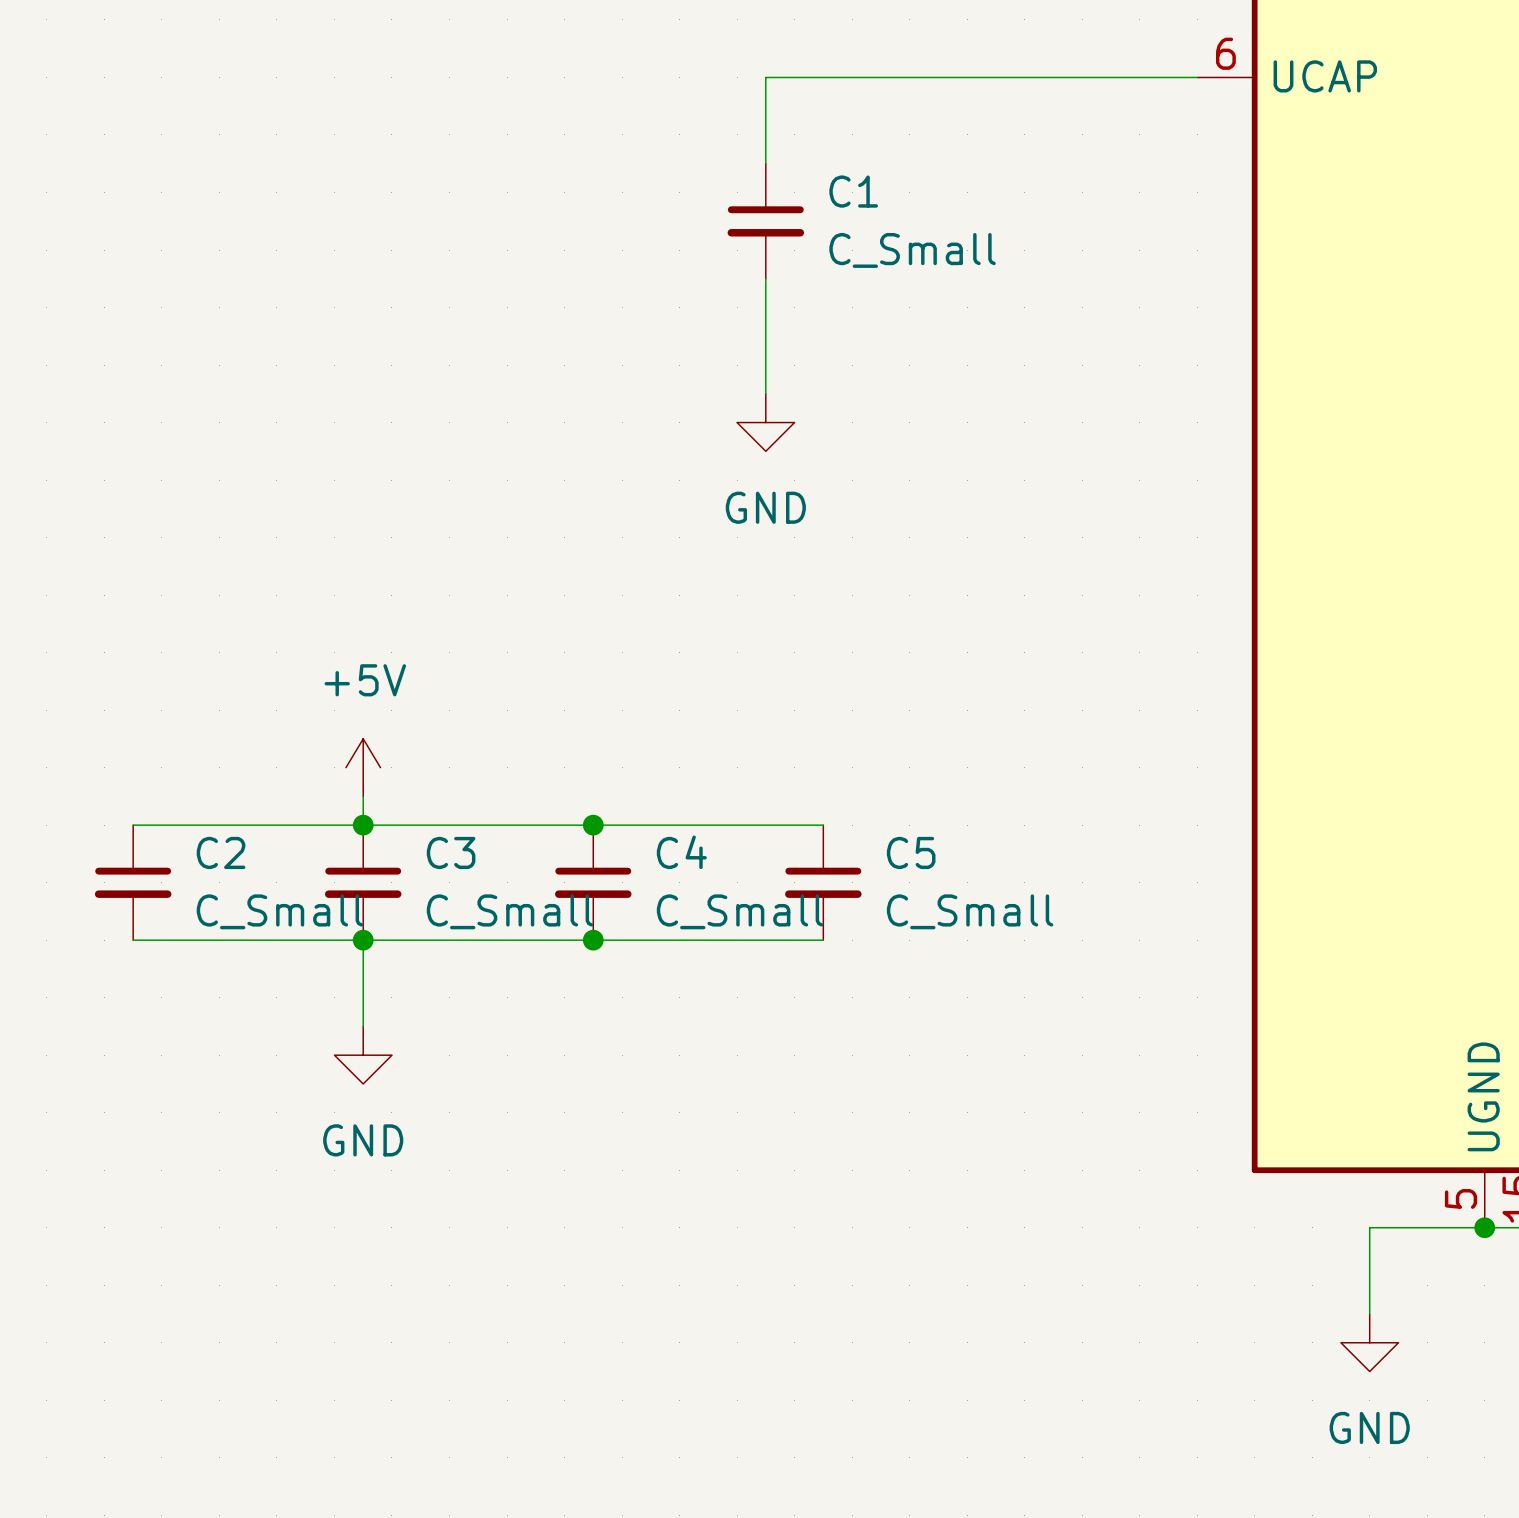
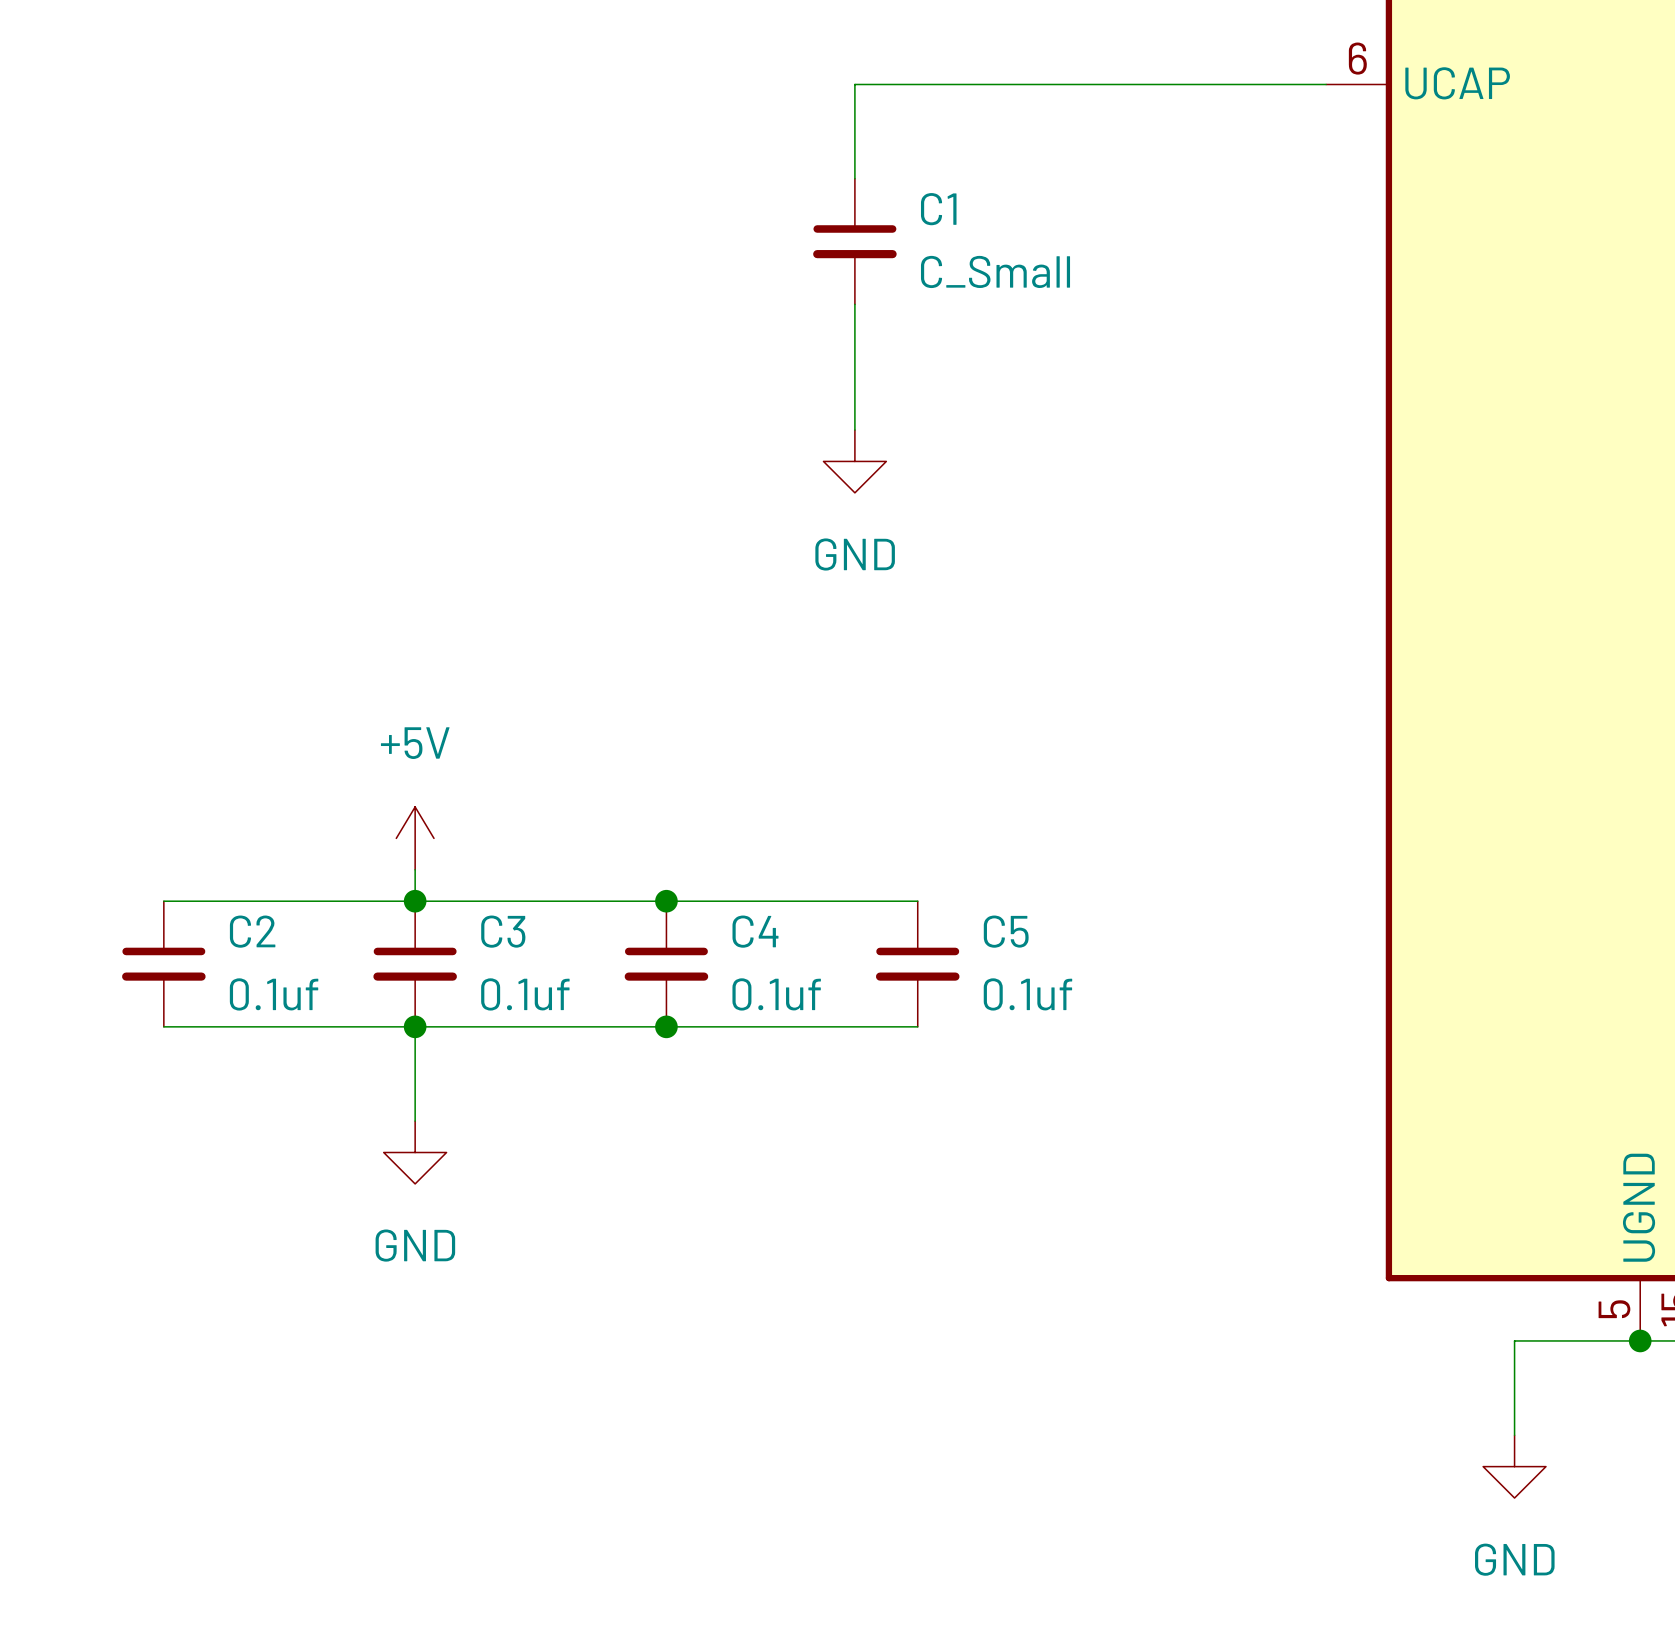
C2 value: C_Small (279, 911) -> 0.1uf (274, 994)
C3 value: C_Small (509, 911) -> 0.1uf (525, 994)
C4 value: C_Small (740, 911) -> 0.1uf (776, 994)
C5 value: C_Small (970, 911) -> 0.1uf (1027, 994)

